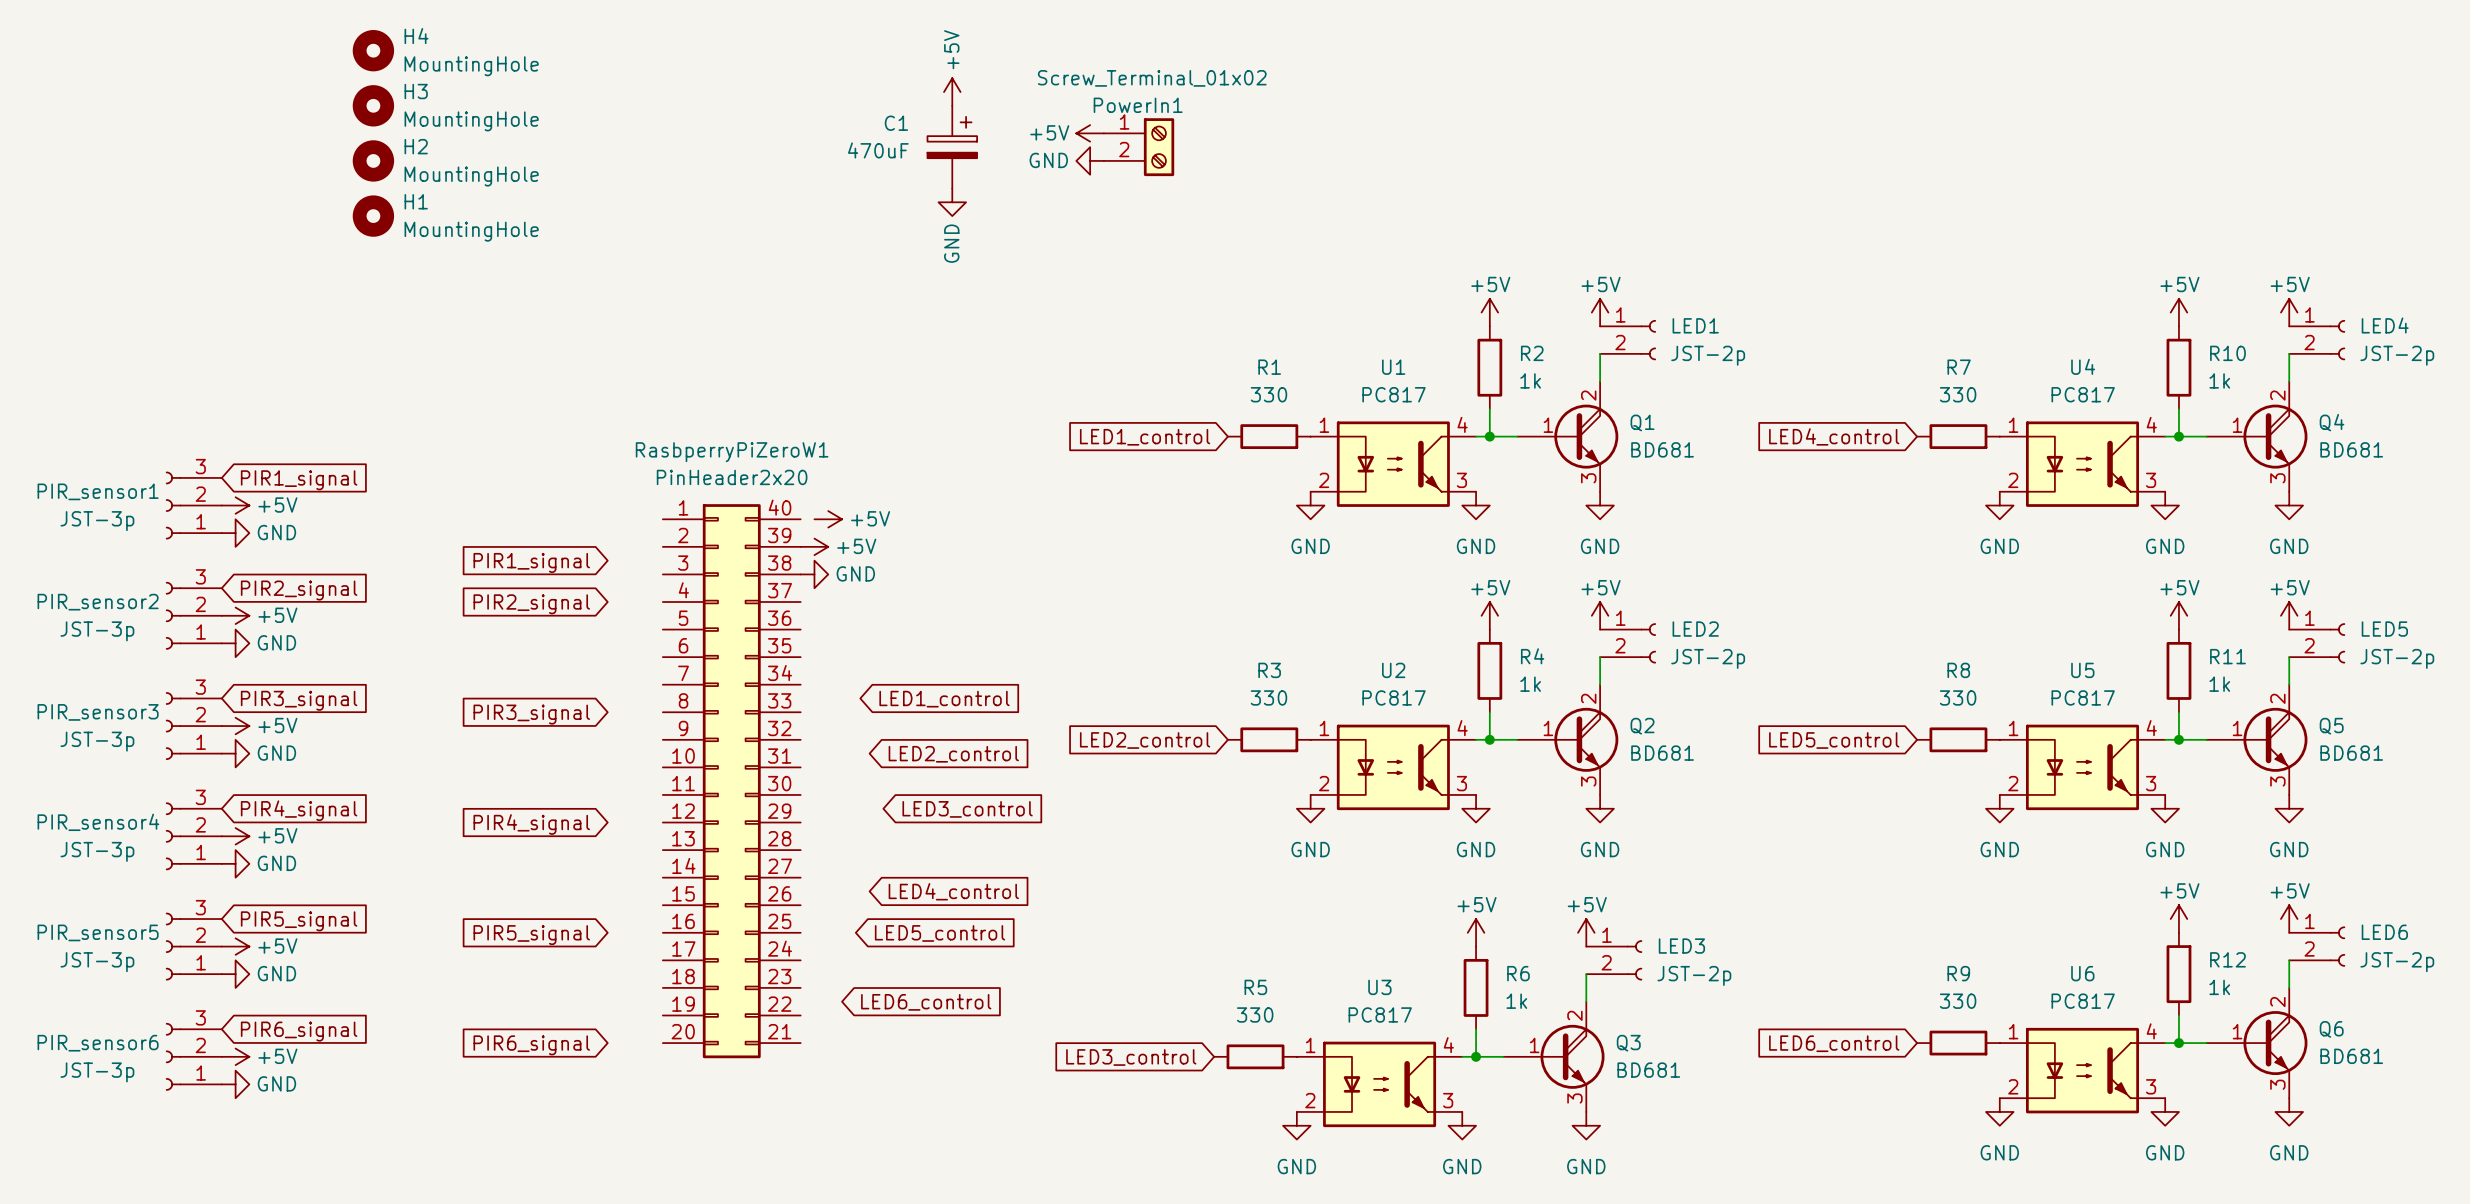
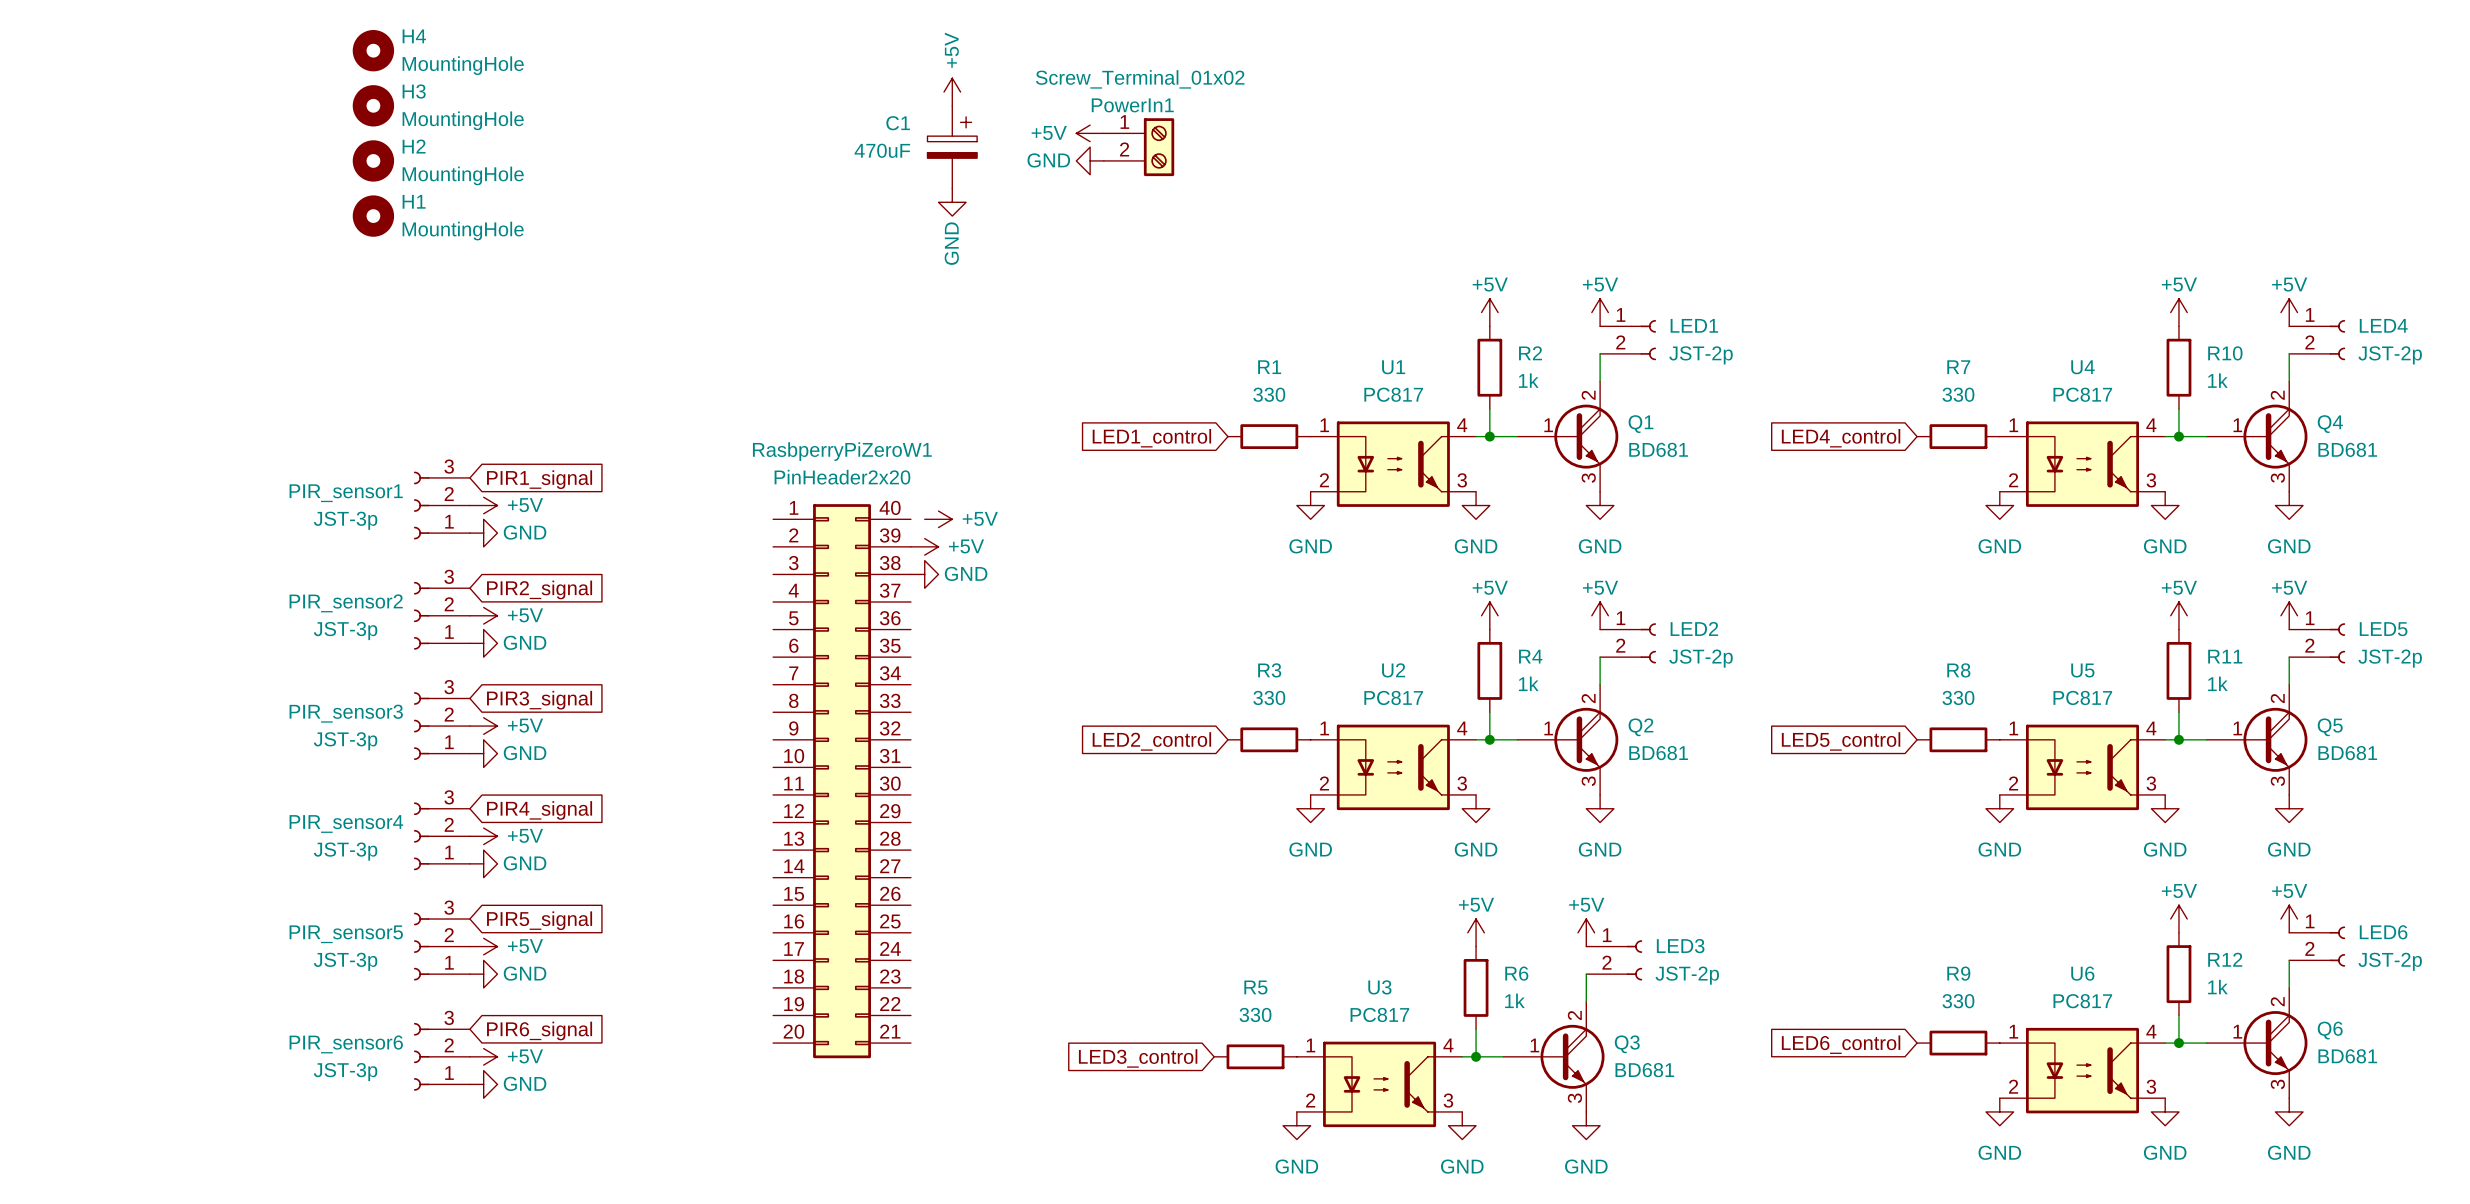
global label: PIR1_signal (299, 480) -> none
global label: none -> PIR1_signal (539, 479)
PIR_sensor1 position: (193, 505) -> (441, 505)
power symbol: +5V (235, 505) -> none
power symbol: none -> +5V (483, 505)
power symbol: +5V (828, 519) -> none
power symbol: none -> +5V (938, 519)
power symbol: GND (235, 533) -> none
power symbol: none -> GND (483, 533)
power symbol: +5V (814, 546) -> none
power symbol: none -> +5V (924, 546)
global label: PIR1_signal (531, 562) -> none
power symbol position: GND (814, 574) -> GND (924, 574)
global label: PIR2_signal (299, 590) -> none
global label: none -> PIR2_signal (539, 589)
global label: PIR2_signal (531, 604) -> none
PIR_sensor2 position: (193, 615) -> (441, 615)
power symbol: +5V (235, 615) -> none
power symbol: none -> +5V (483, 615)
power symbol: GND (235, 643) -> none
power symbol: none -> GND (483, 643)
global label: LED1_control (944, 699) -> none
global label: PIR3_signal (299, 700) -> none
global label rotation: 0° (531, 714) -> 180° (539, 700)
PIR_sensor3 position: (193, 726) -> (441, 726)
power symbol: +5V (235, 726) -> none
power symbol: none -> +5V (483, 726)
power symbol: GND (235, 753) -> none
power symbol: none -> GND (483, 753)
global label: LED2_control (953, 754) -> none
RasbperryPiZeroW1 position: (731, 781) -> (842, 781)
global label: LED3_control (967, 809) -> none
global label: PIR4_signal (299, 810) -> none
global label rotation: 0° (531, 824) -> 180° (539, 810)
PIR_sensor4 position: (193, 836) -> (441, 836)
power symbol: +5V (235, 836) -> none
power symbol: none -> +5V (483, 836)
power symbol: GND (235, 863) -> none
power symbol: none -> GND (483, 863)
global label: LED4_control (953, 891) -> none
global label: PIR5_signal (299, 921) -> none
global label: LED5_control (940, 933) -> none
global label rotation: 0° (531, 935) -> 180° (539, 920)
PIR_sensor5 position: (193, 946) -> (441, 946)
power symbol: +5V (235, 946) -> none
power symbol: none -> +5V (483, 946)
power symbol: GND (235, 974) -> none
power symbol: none -> GND (483, 974)
global label: LED6_control (926, 1002) -> none
global label: PIR6_signal (299, 1031) -> none
global label rotation: 0° (531, 1045) -> 180° (539, 1030)
PIR_sensor6 position: (193, 1056) -> (441, 1056)
power symbol: +5V (235, 1056) -> none
power symbol: none -> +5V (483, 1056)
power symbol: GND (235, 1084) -> none
power symbol: none -> GND (483, 1084)

